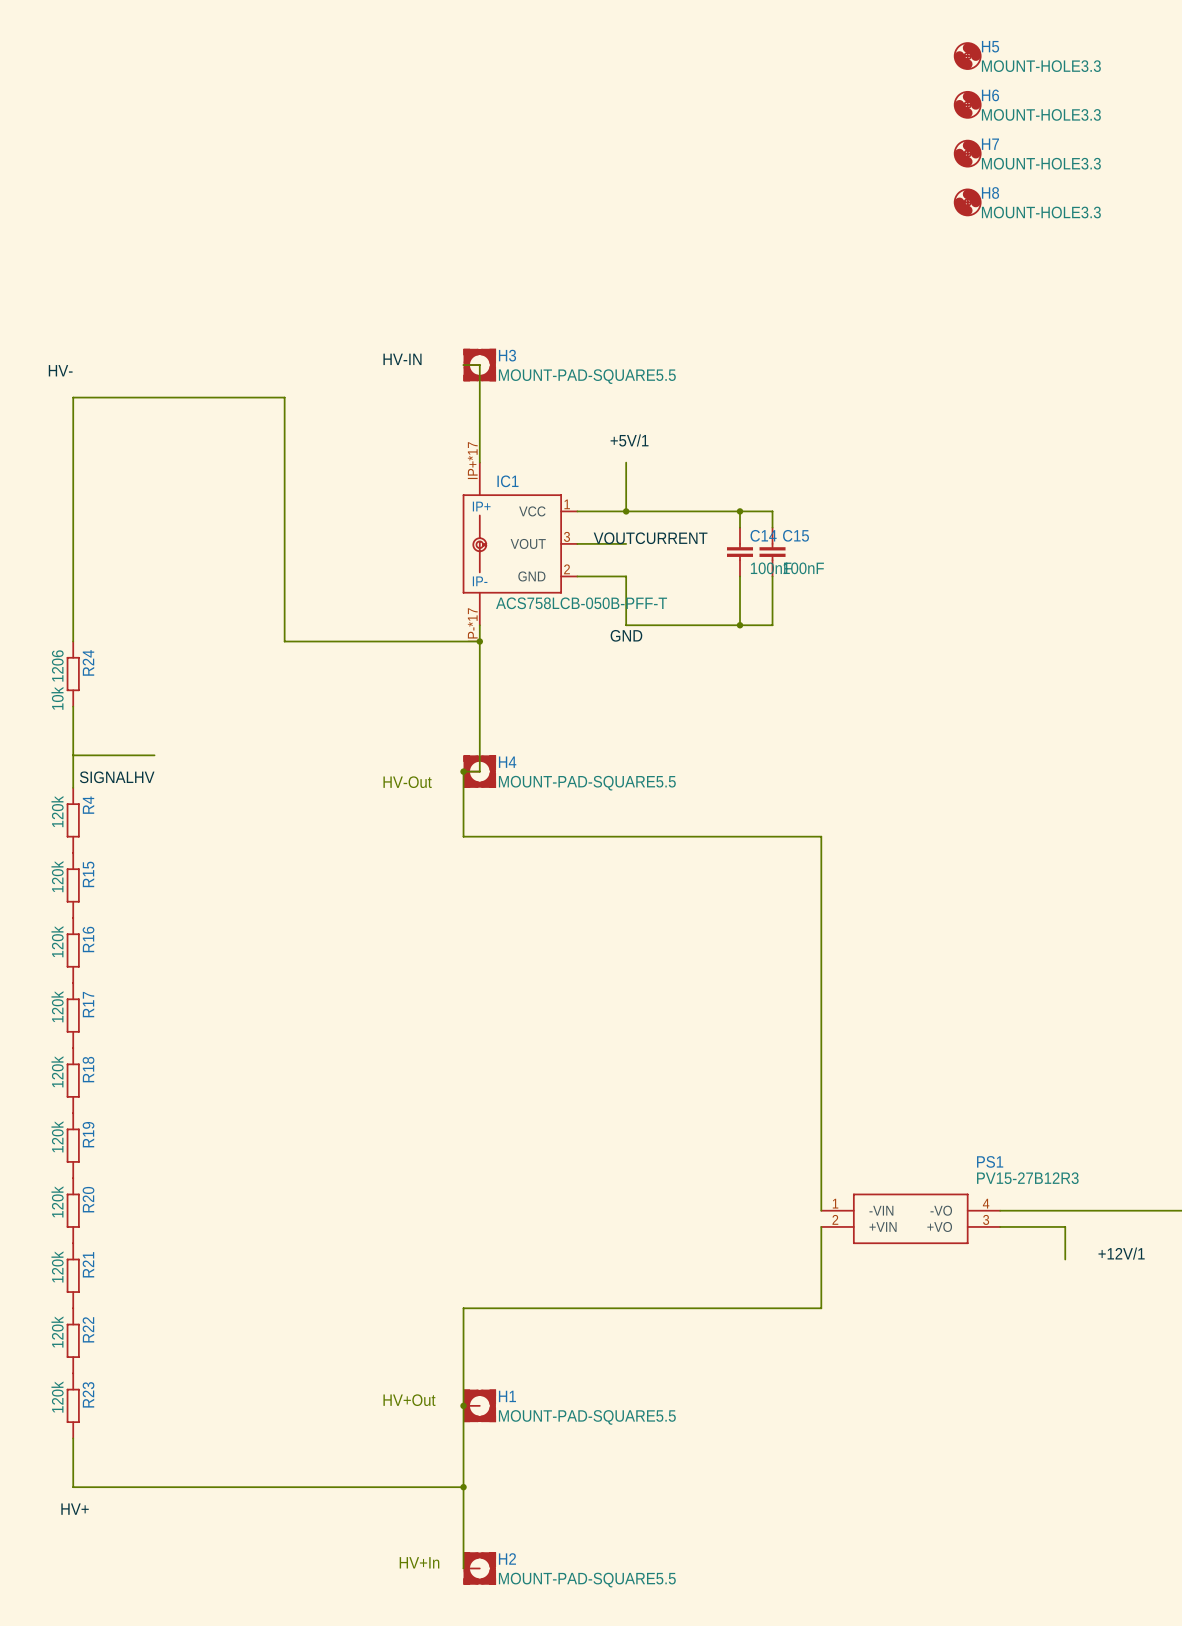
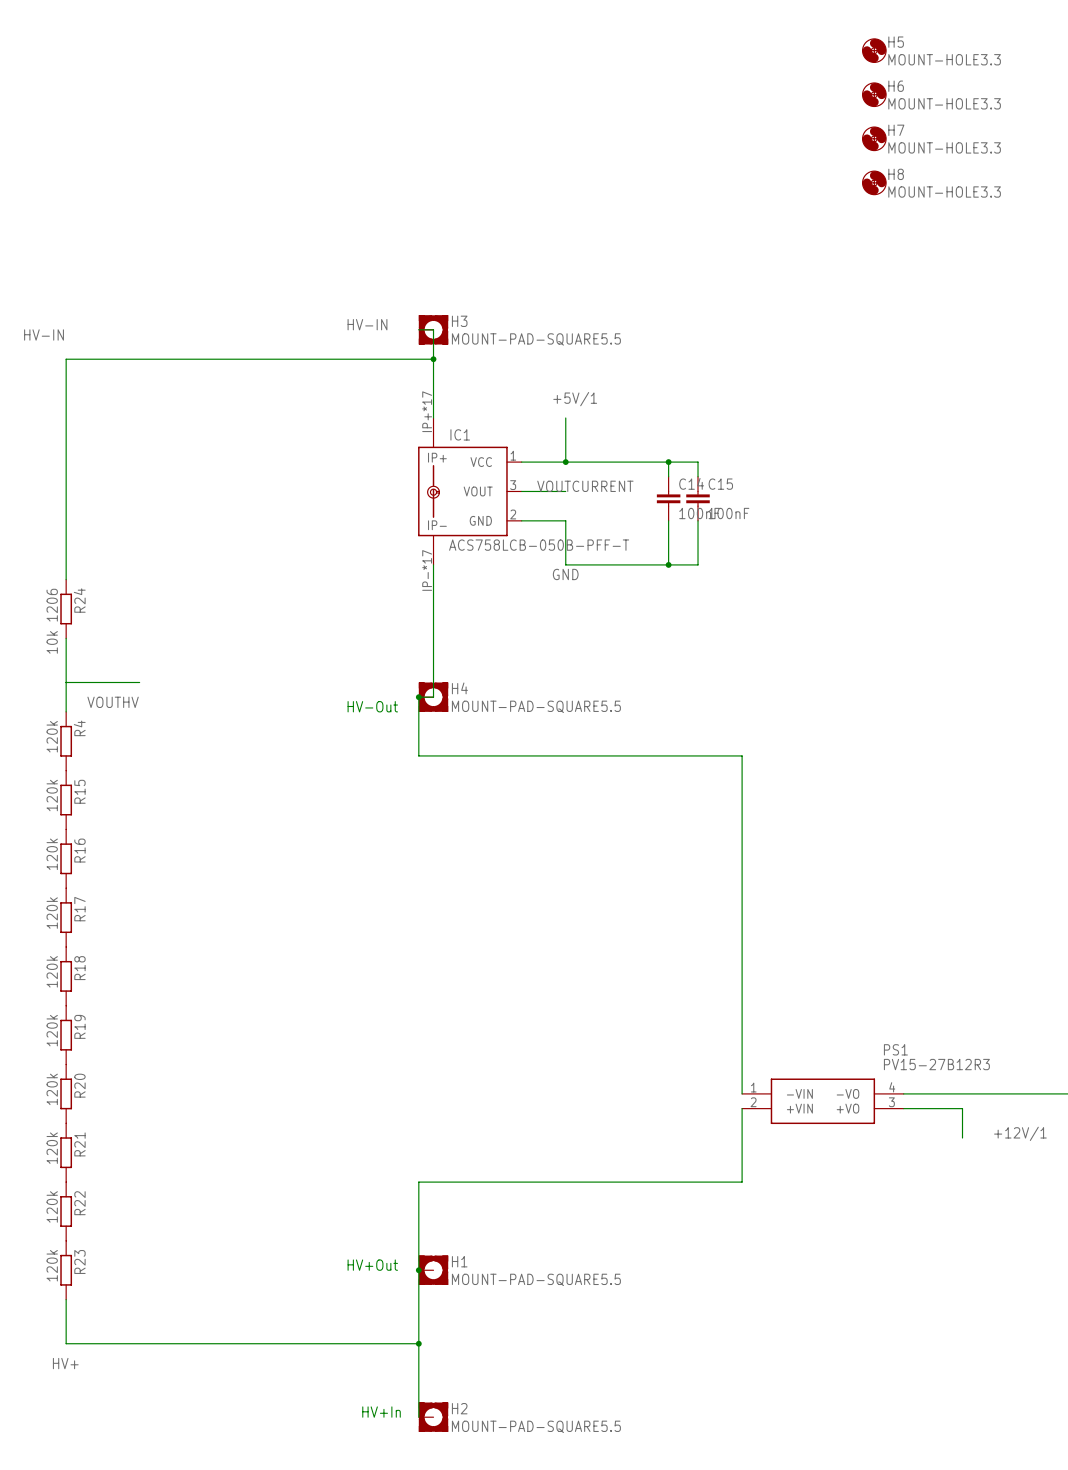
label: HV- (60, 370) -> HV-IN (44, 334)
wire: (284, 397) (284, 641) (479, 641) -> (257, 359) (433, 359)
junction: none -> (433, 359)
junction: (479, 641) -> none
label: SIGNALHV (117, 777) -> VOUTHV (113, 702)

